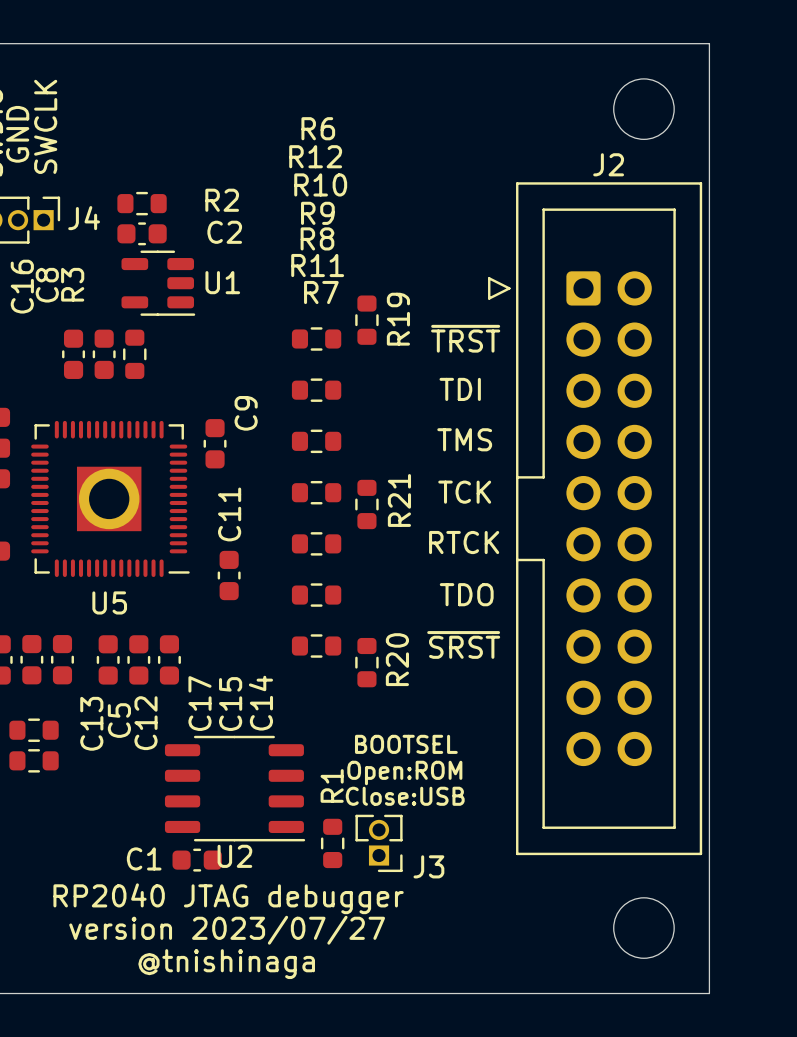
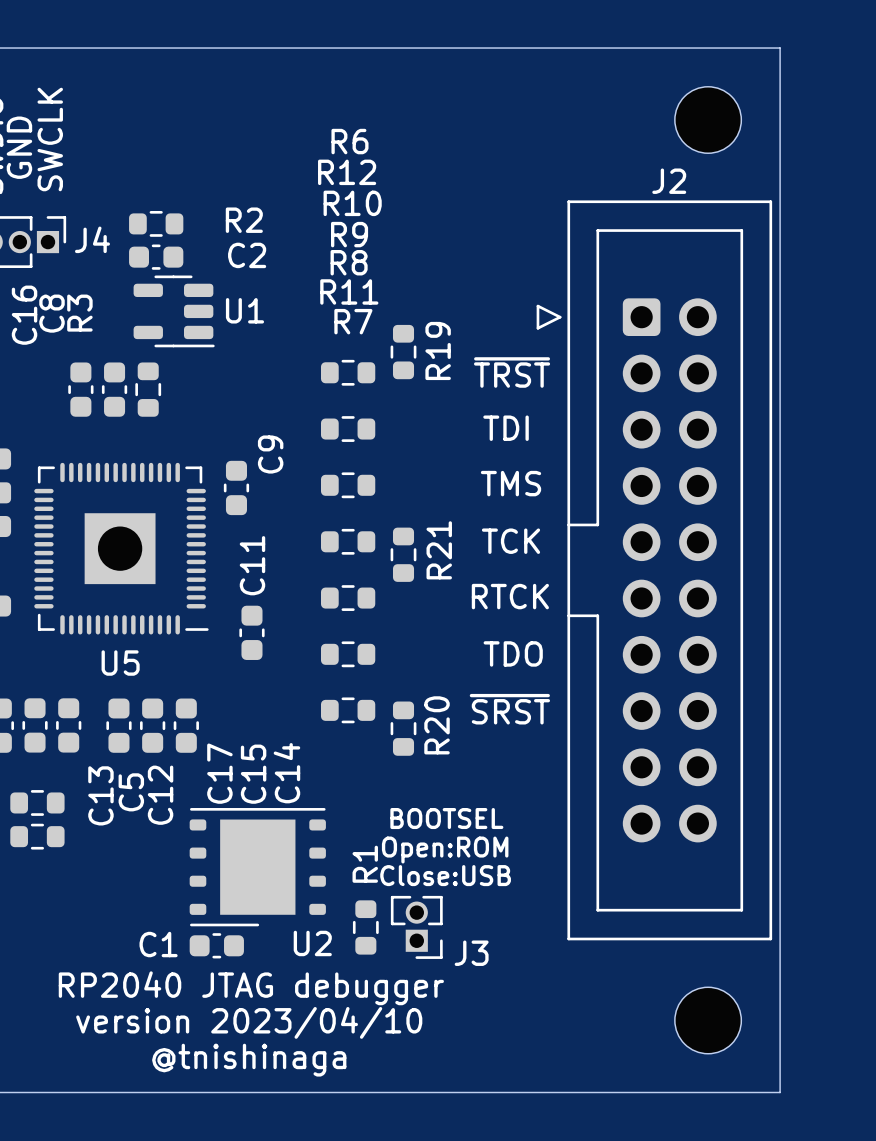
U2 footprint: [164, 735, 306, 842] -> [189, 808, 326, 927]
U2 name position: U2 (234, 856) -> U2 (312, 943)
text: version 2023/07/27 (227, 930) -> version 2023/04/10 (249, 1022)

